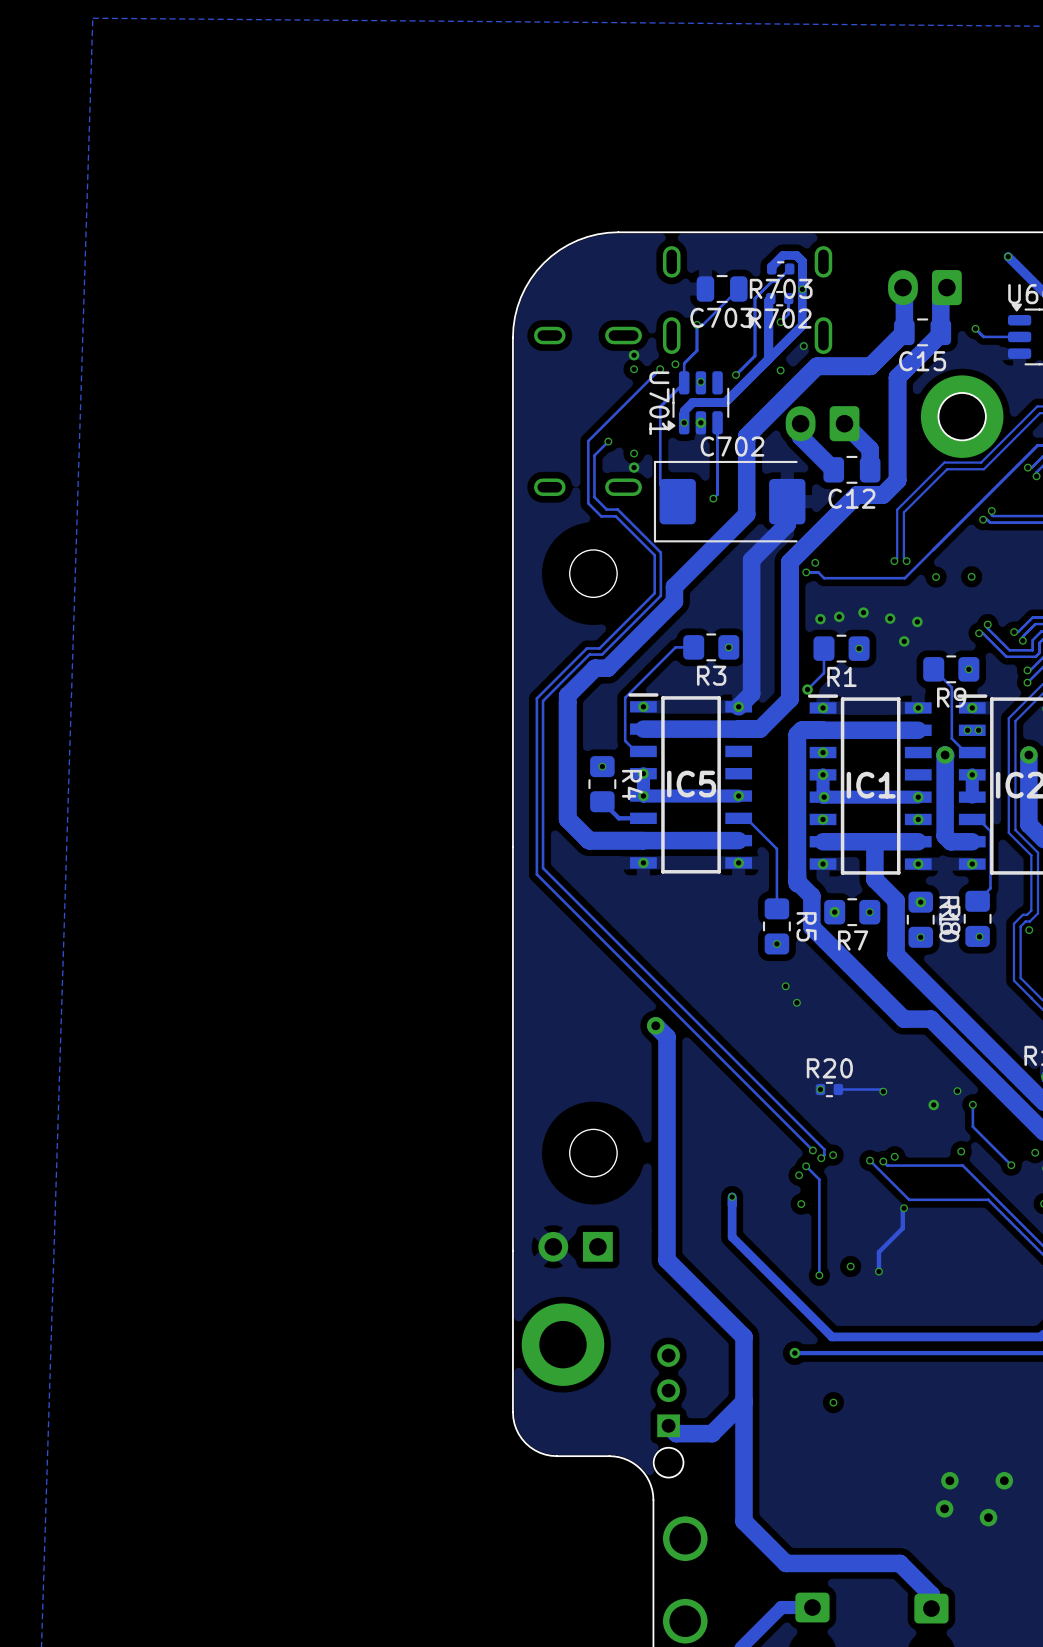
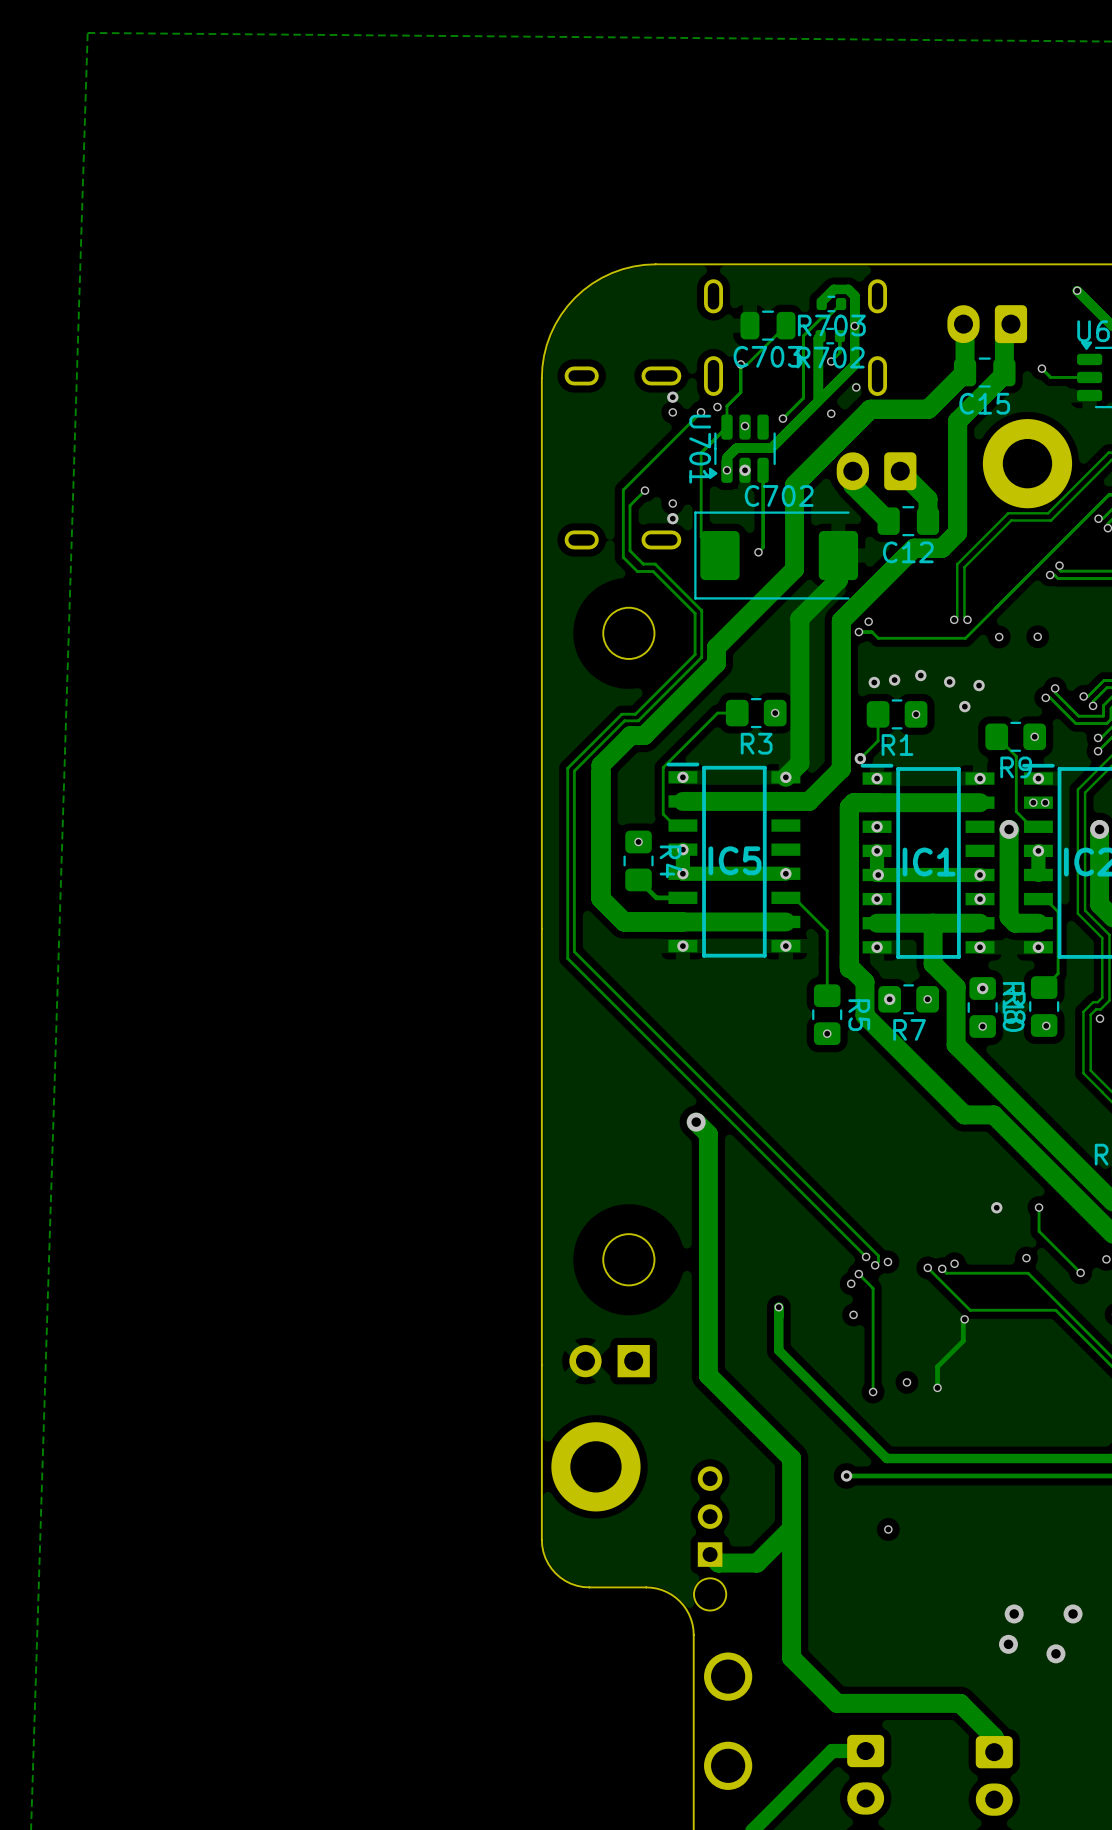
via: (785, 986) -> none
via: (796, 1002) -> none
via: (820, 1089) -> none
R20: (829, 1089) -> none
track: (838, 1089) (881, 1089) (883, 1091) -> none
via: (883, 1091) -> none
via: (957, 1091) -> none

